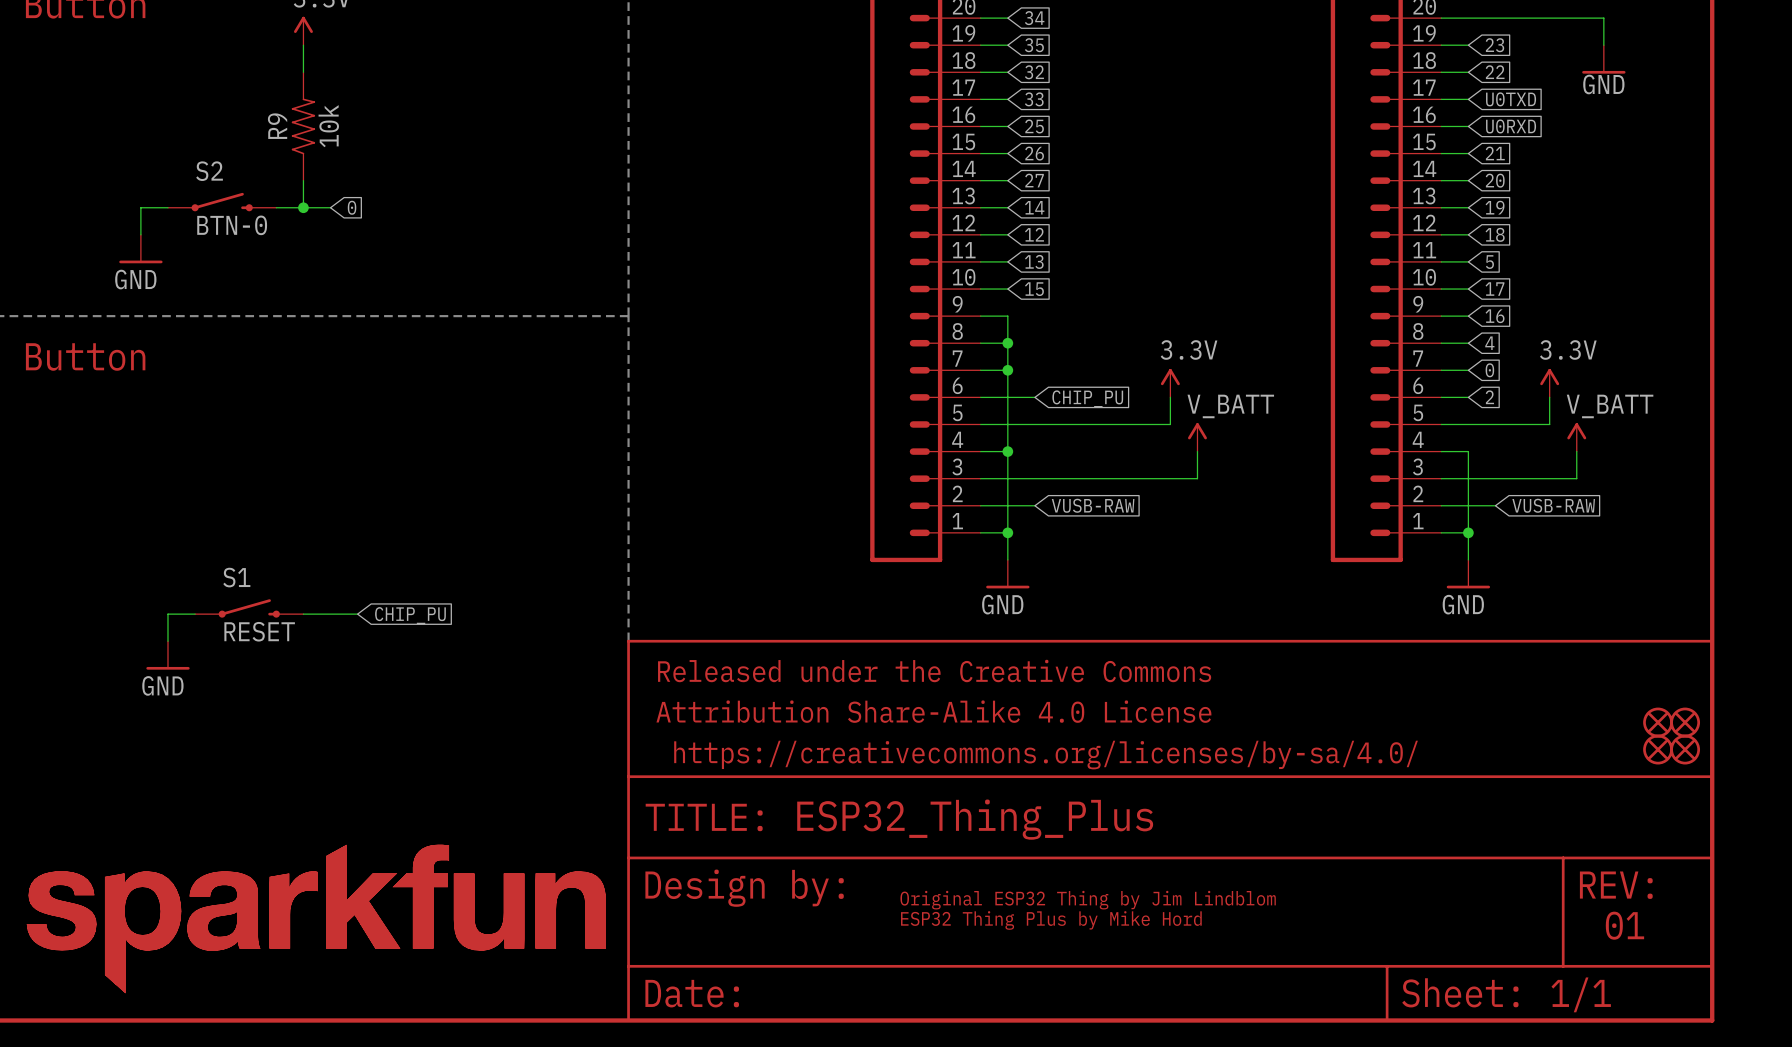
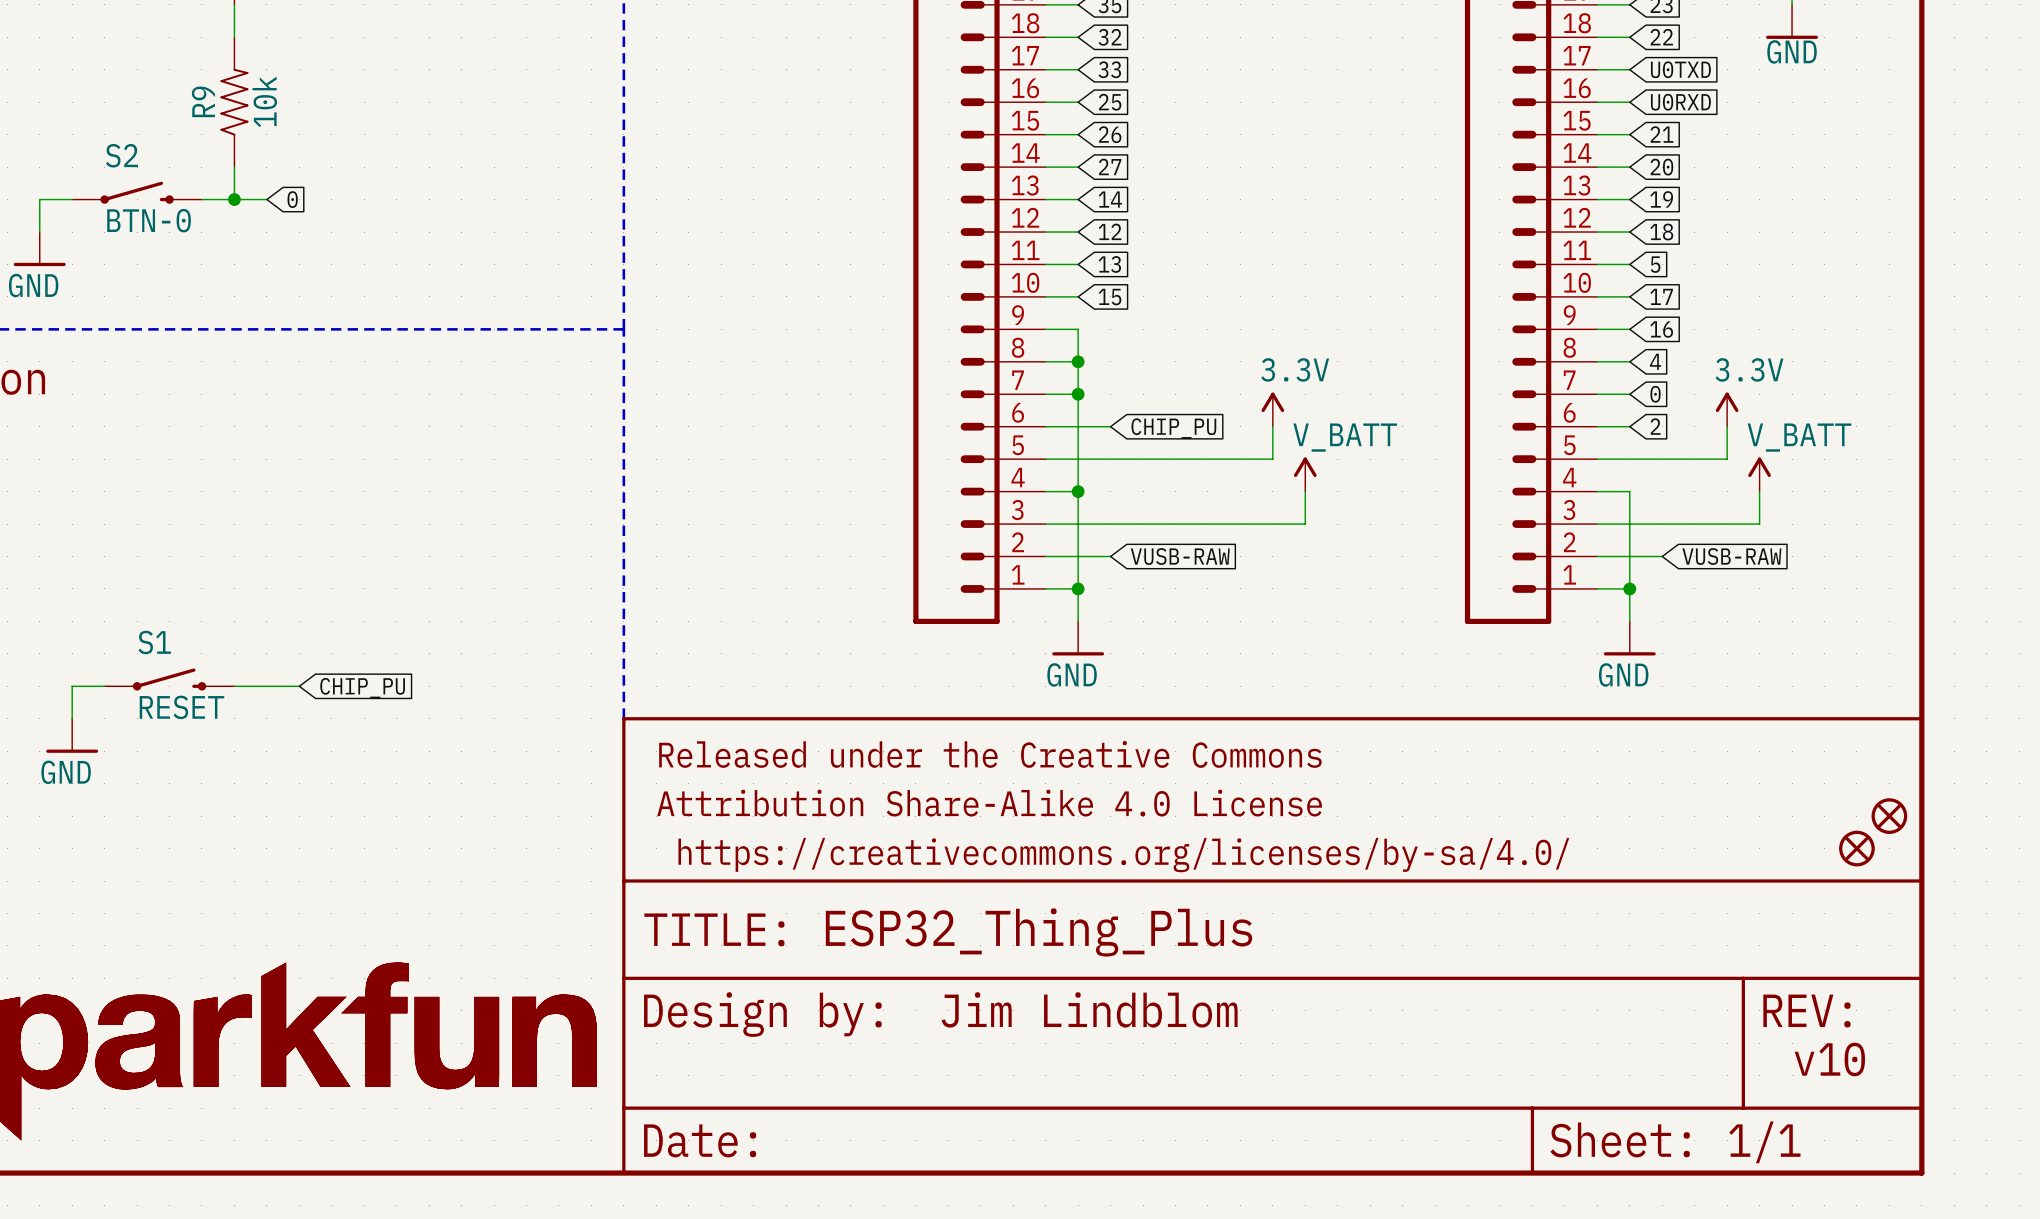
part: (1658, 722) -> none
part: (1685, 749) -> none
text: Original ESP32 Thing by Jim Lindblom (1088, 900) -> Jim Lindblom (1089, 1009)
text: ESP32 Thing Plus by Mike Hord (1051, 920) -> none
text: 01 (1624, 925) -> v10 (1829, 1059)

